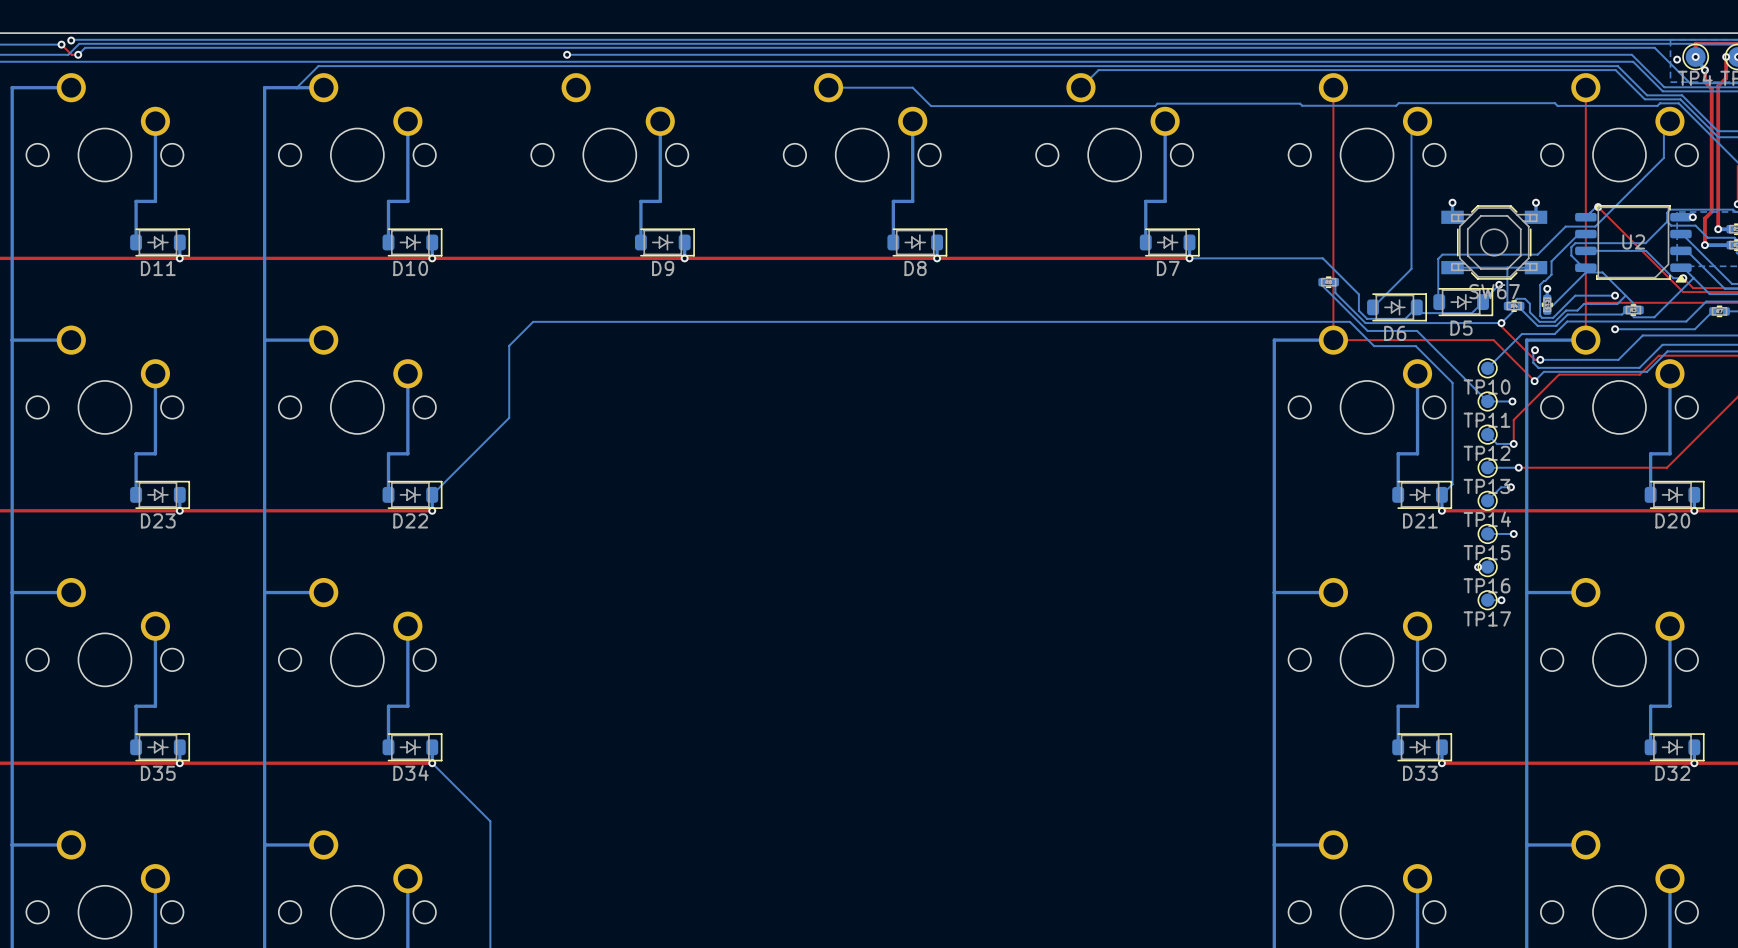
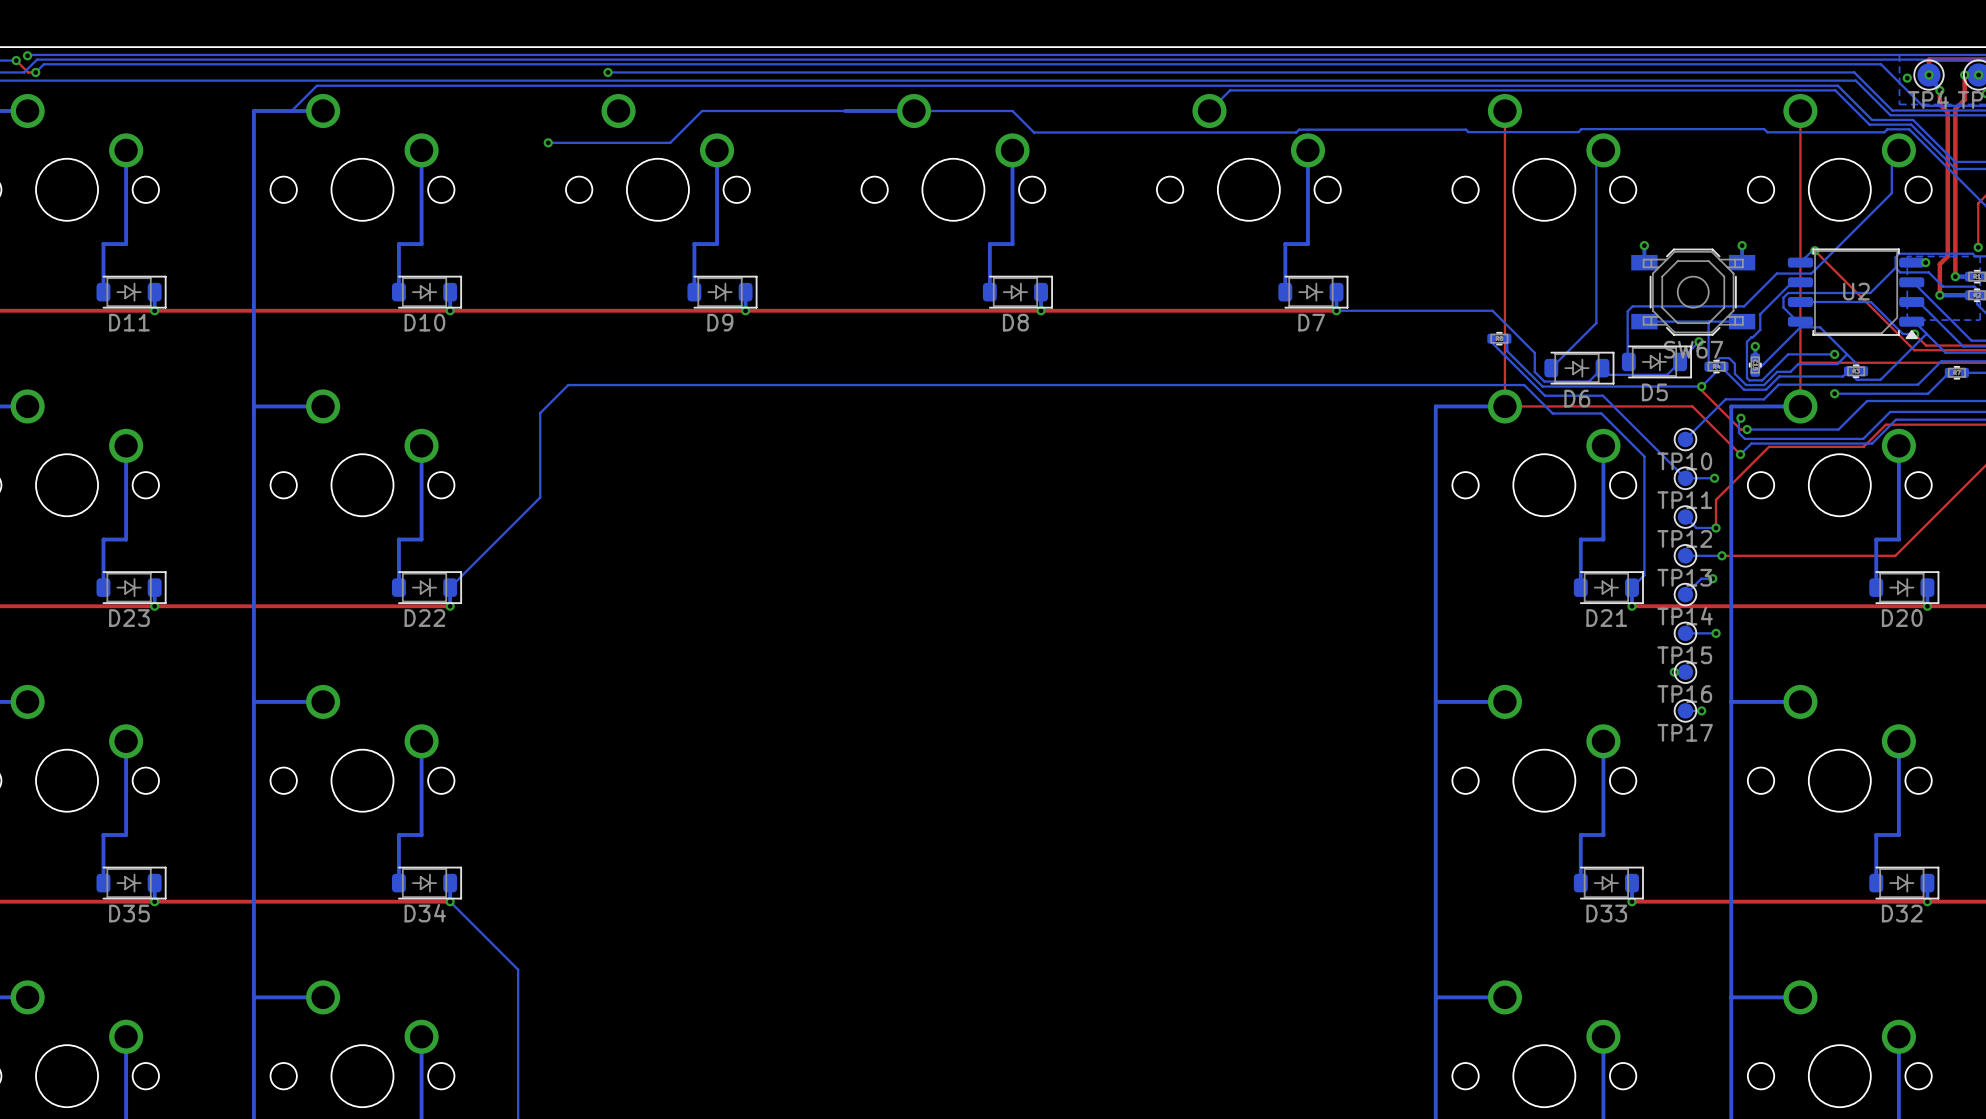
bottom track: none -> (914, 110) (702, 110) (670, 142) (548, 142)
via: none -> (548, 142)

